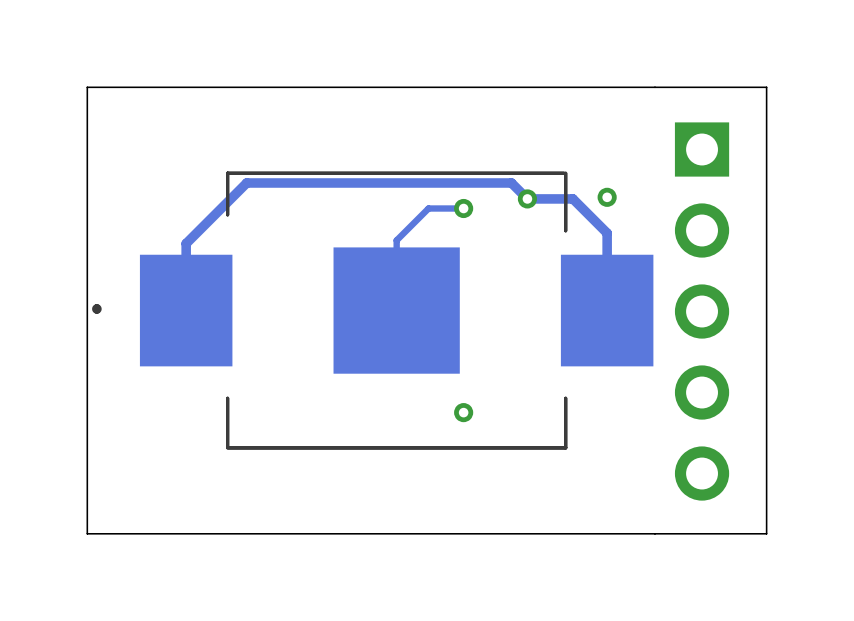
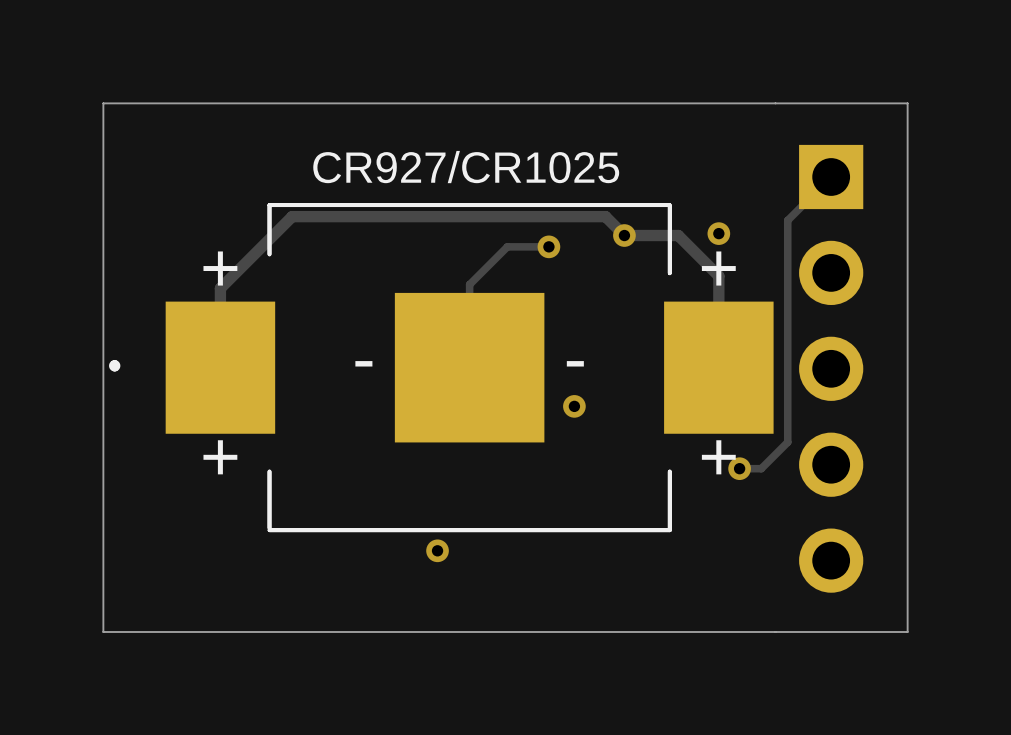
text: none -> CR927/CR1025 (466, 167)
track: none -> (831, 177) (787, 220) (787, 442) (761, 468) (739, 468)
text: none -> + (220, 268)
text: none -> + (718, 268)
text: none -> - (363, 363)
text: none -> - (575, 363)
via: none -> (574, 406)
text: none -> + (220, 457)
text: none -> + (718, 457)
via: none -> (739, 468)
via: (463, 412) -> none
via: none -> (437, 550)

